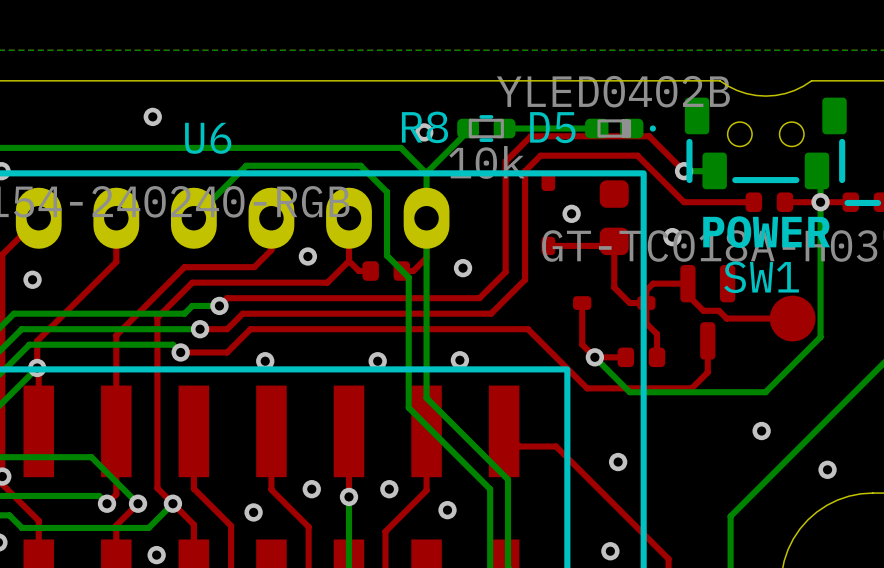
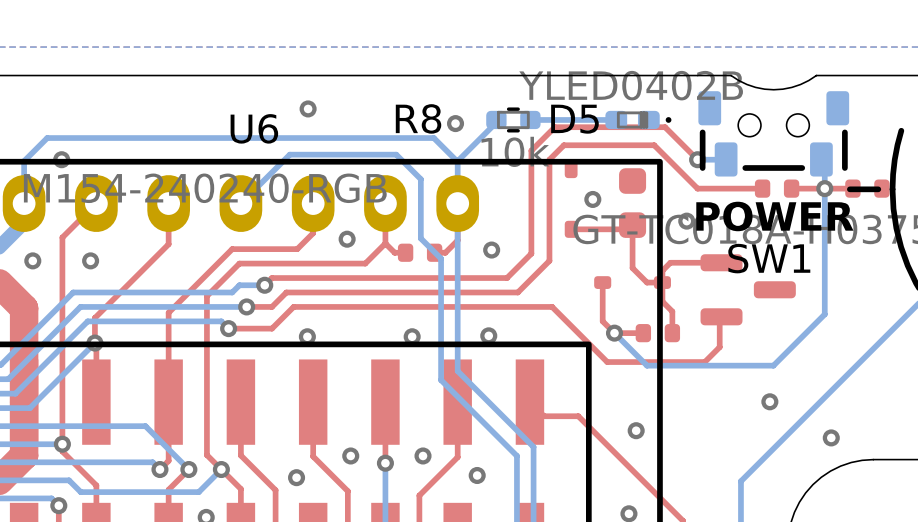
via position: (152, 116) -> (308, 108)
R8 name position: R8 (425, 127) -> R8 (418, 118)
top track: (653, 283) (687, 283) (687, 295) (703, 310) (718, 310) (726, 318) (792, 318) -> (668, 264) (670, 262) (721, 262)
part: none -> (748, 289)
part: (707, 312) -> none
part: (792, 318) -> none

